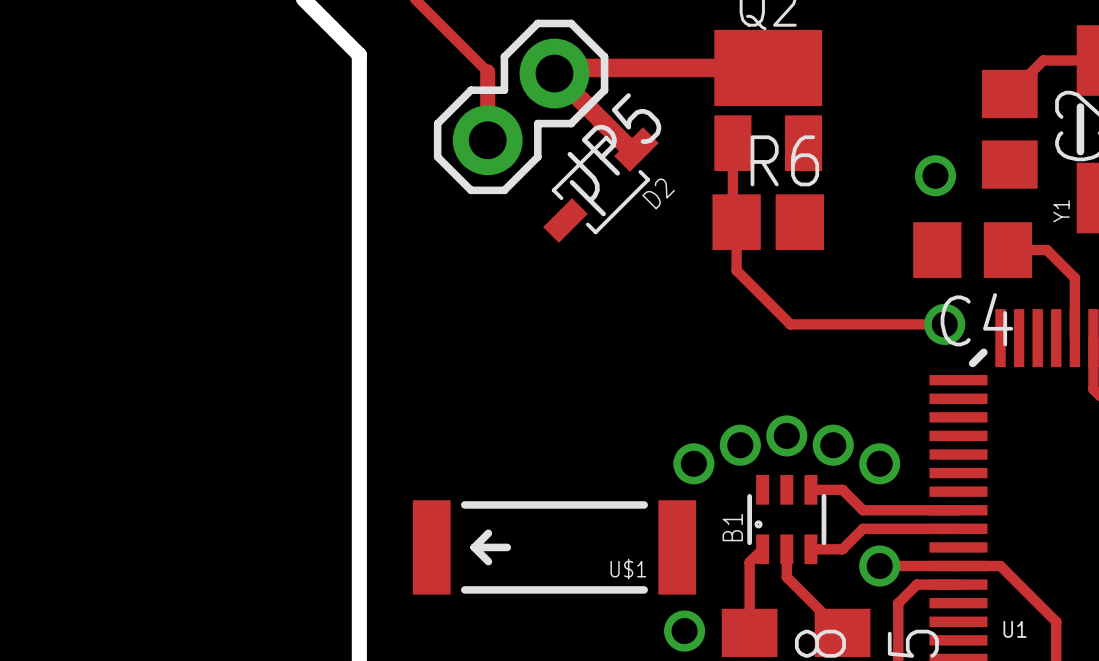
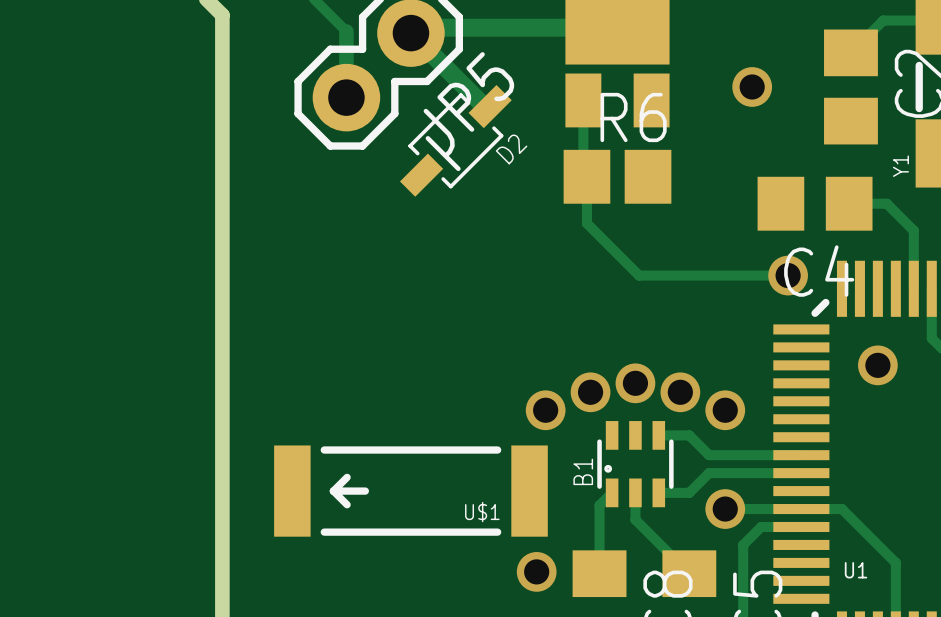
via position: (935, 175) -> (752, 86)
via: none -> (877, 365)

